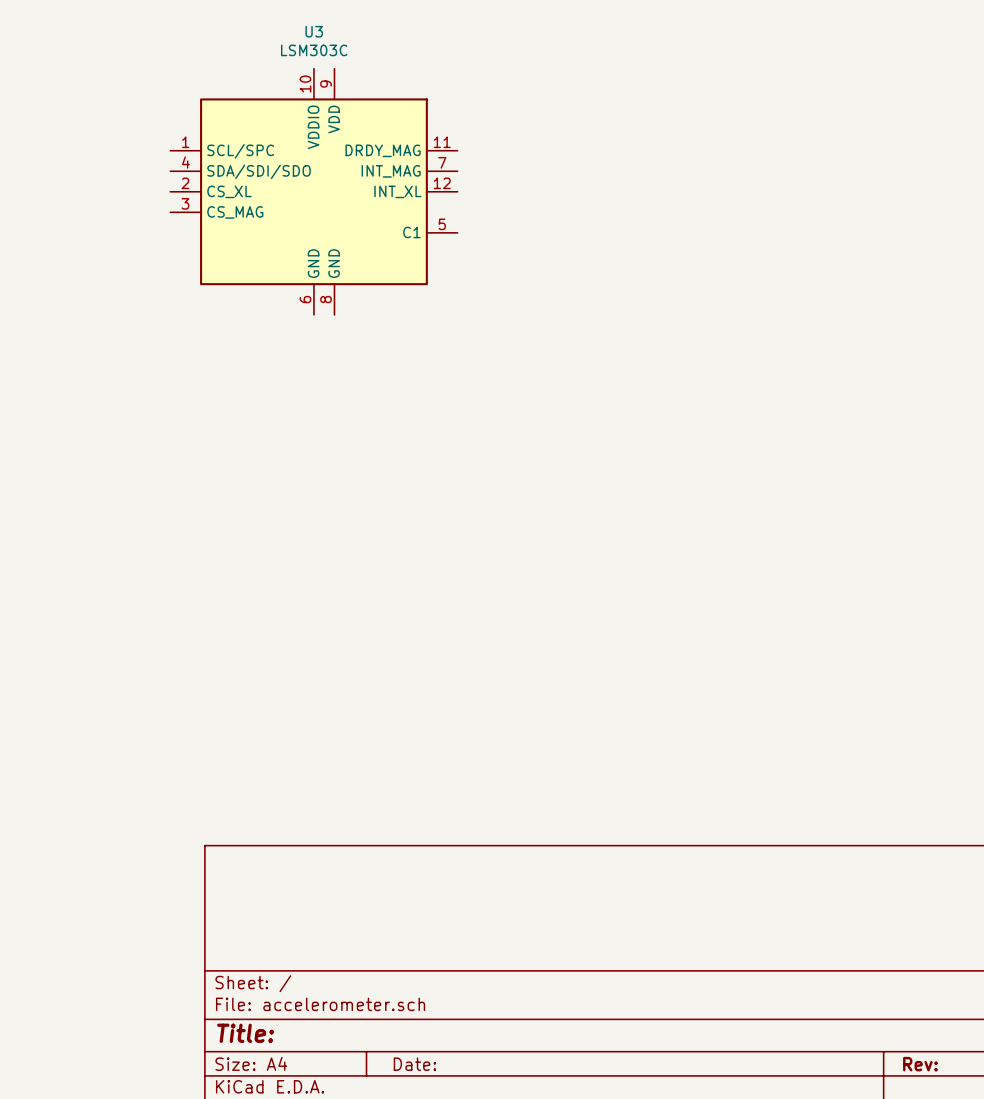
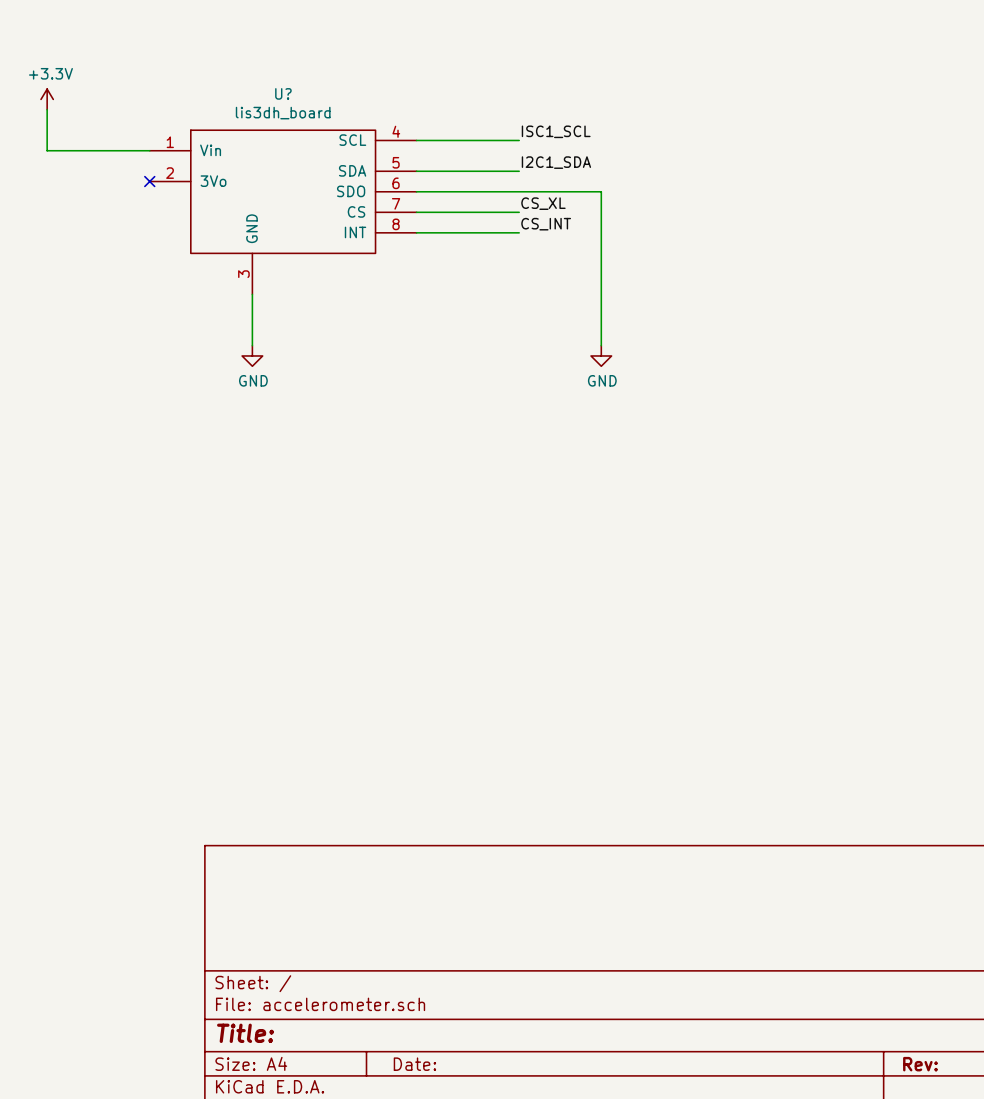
power symbol: none -> +3.3V (47, 99)
wire: none -> (47, 109) (47, 150) (149, 150)
label: none -> ISC1_SCL (556, 131)
wire: none -> (416, 140) (519, 140)
label: none -> I2C1_SDA (556, 162)
wire: none -> (416, 171) (519, 171)
no-connect mark: none -> (149, 181)
U3: LSM303C (313, 191) -> none
wire: none -> (416, 191) (601, 191) (601, 345)
label: none -> CS_XL (543, 203)
U?: none -> lis3dh_board (283, 212)
wire: none -> (416, 212) (519, 212)
label: none -> CS_INT (546, 224)
wire: none -> (416, 232) (519, 232)
wire: none -> (252, 294) (252, 345)
power symbol: none -> GND (252, 355)
power symbol: none -> GND (601, 355)

